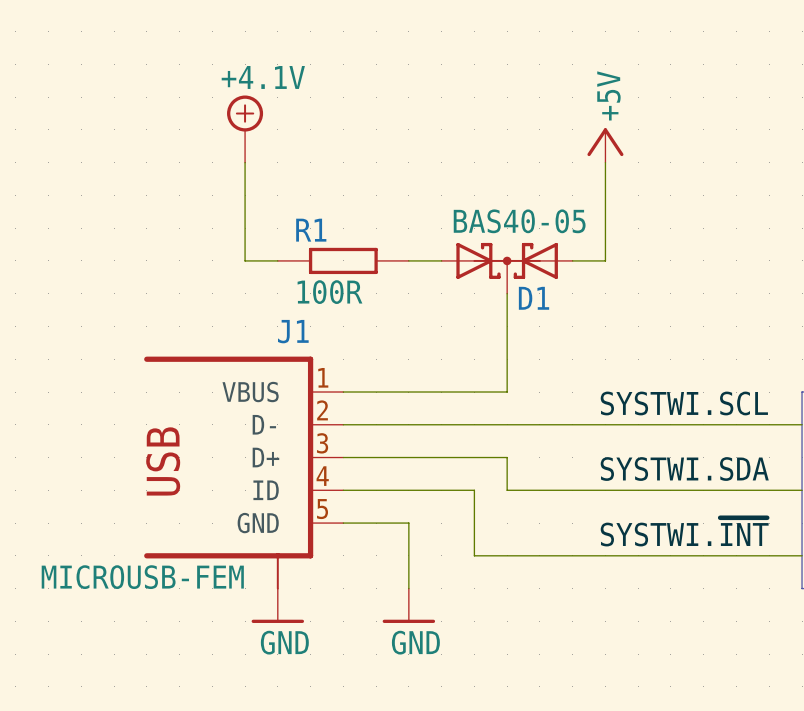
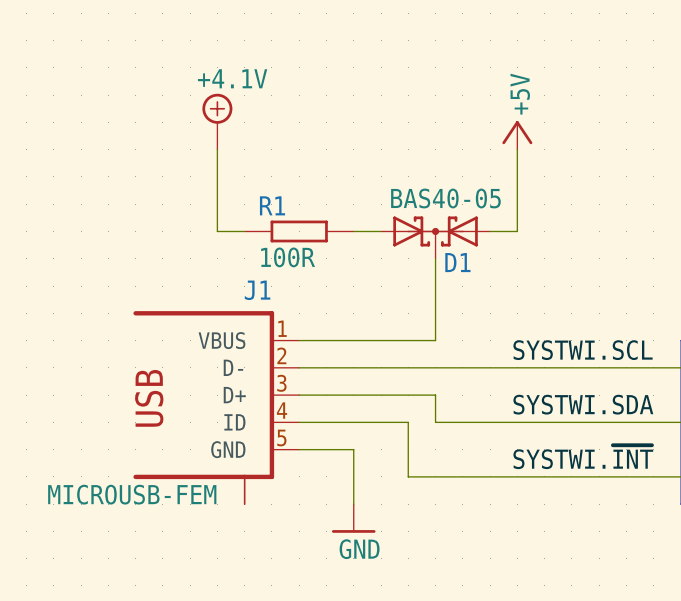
power symbol: GND (277, 605) -> none

